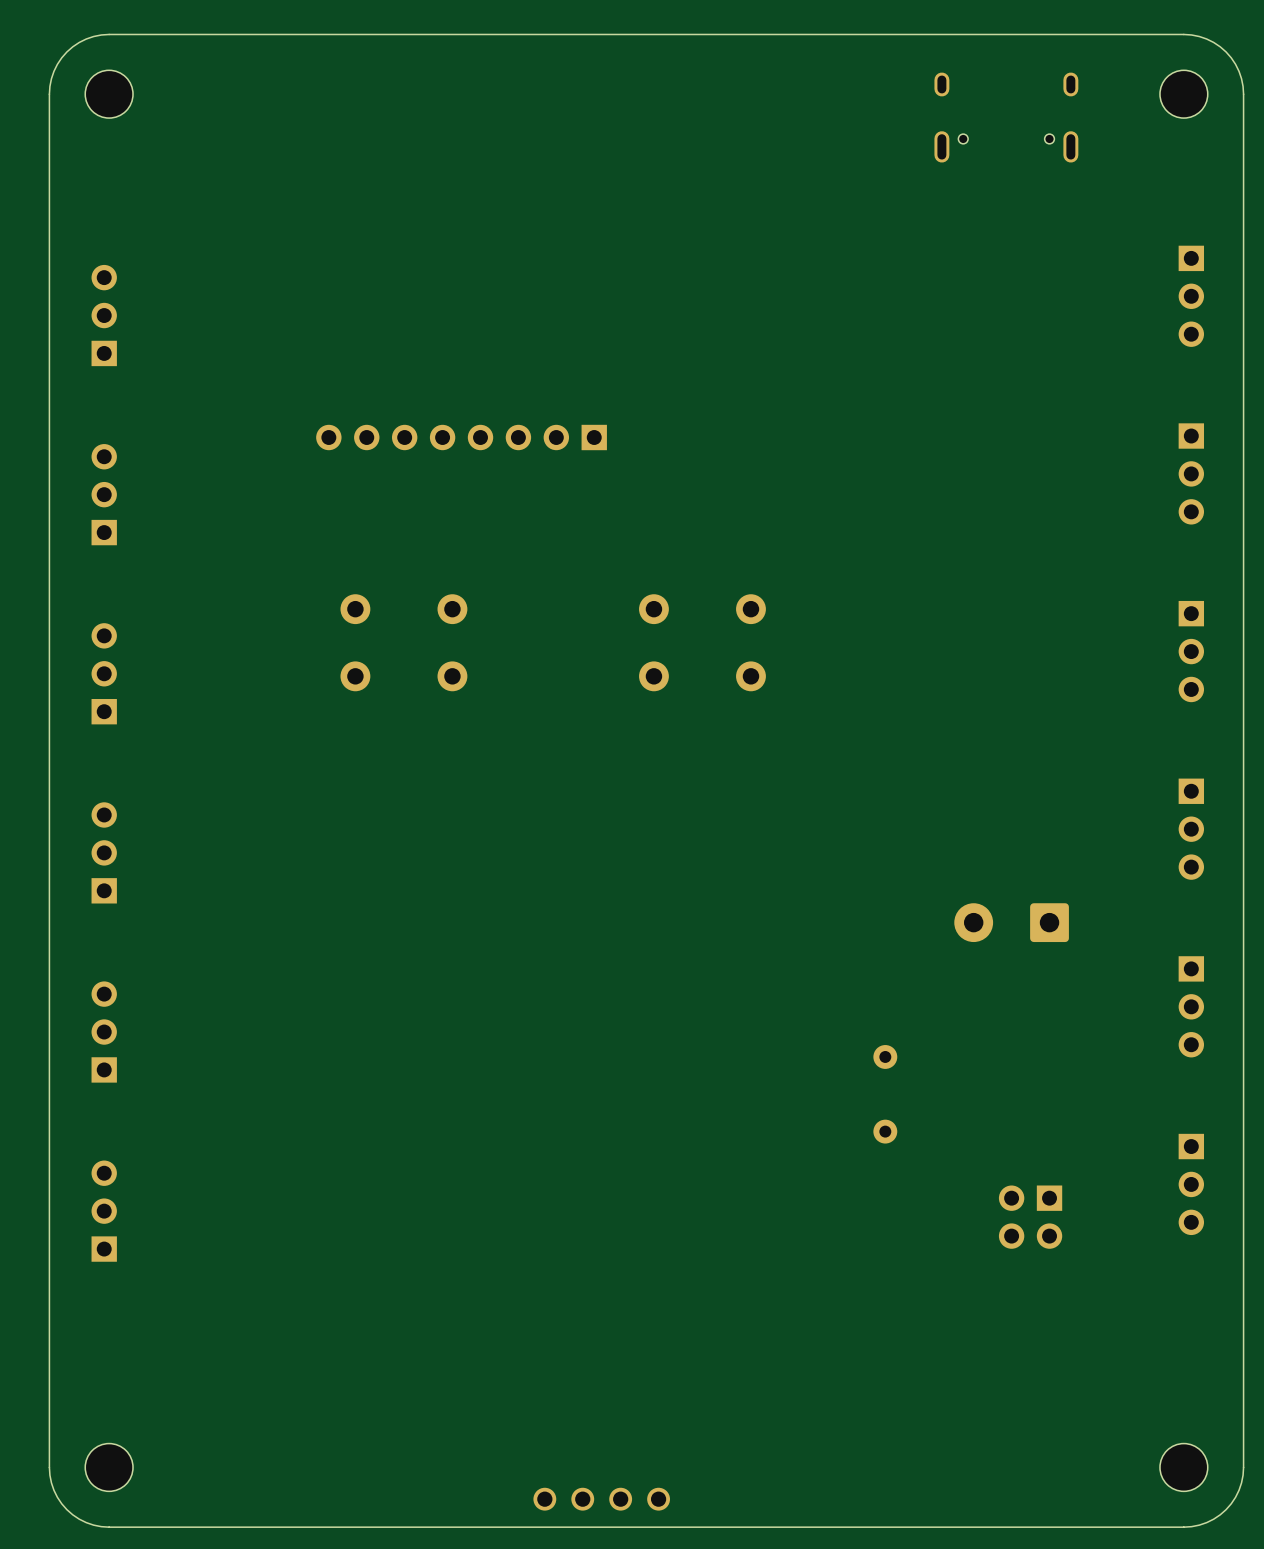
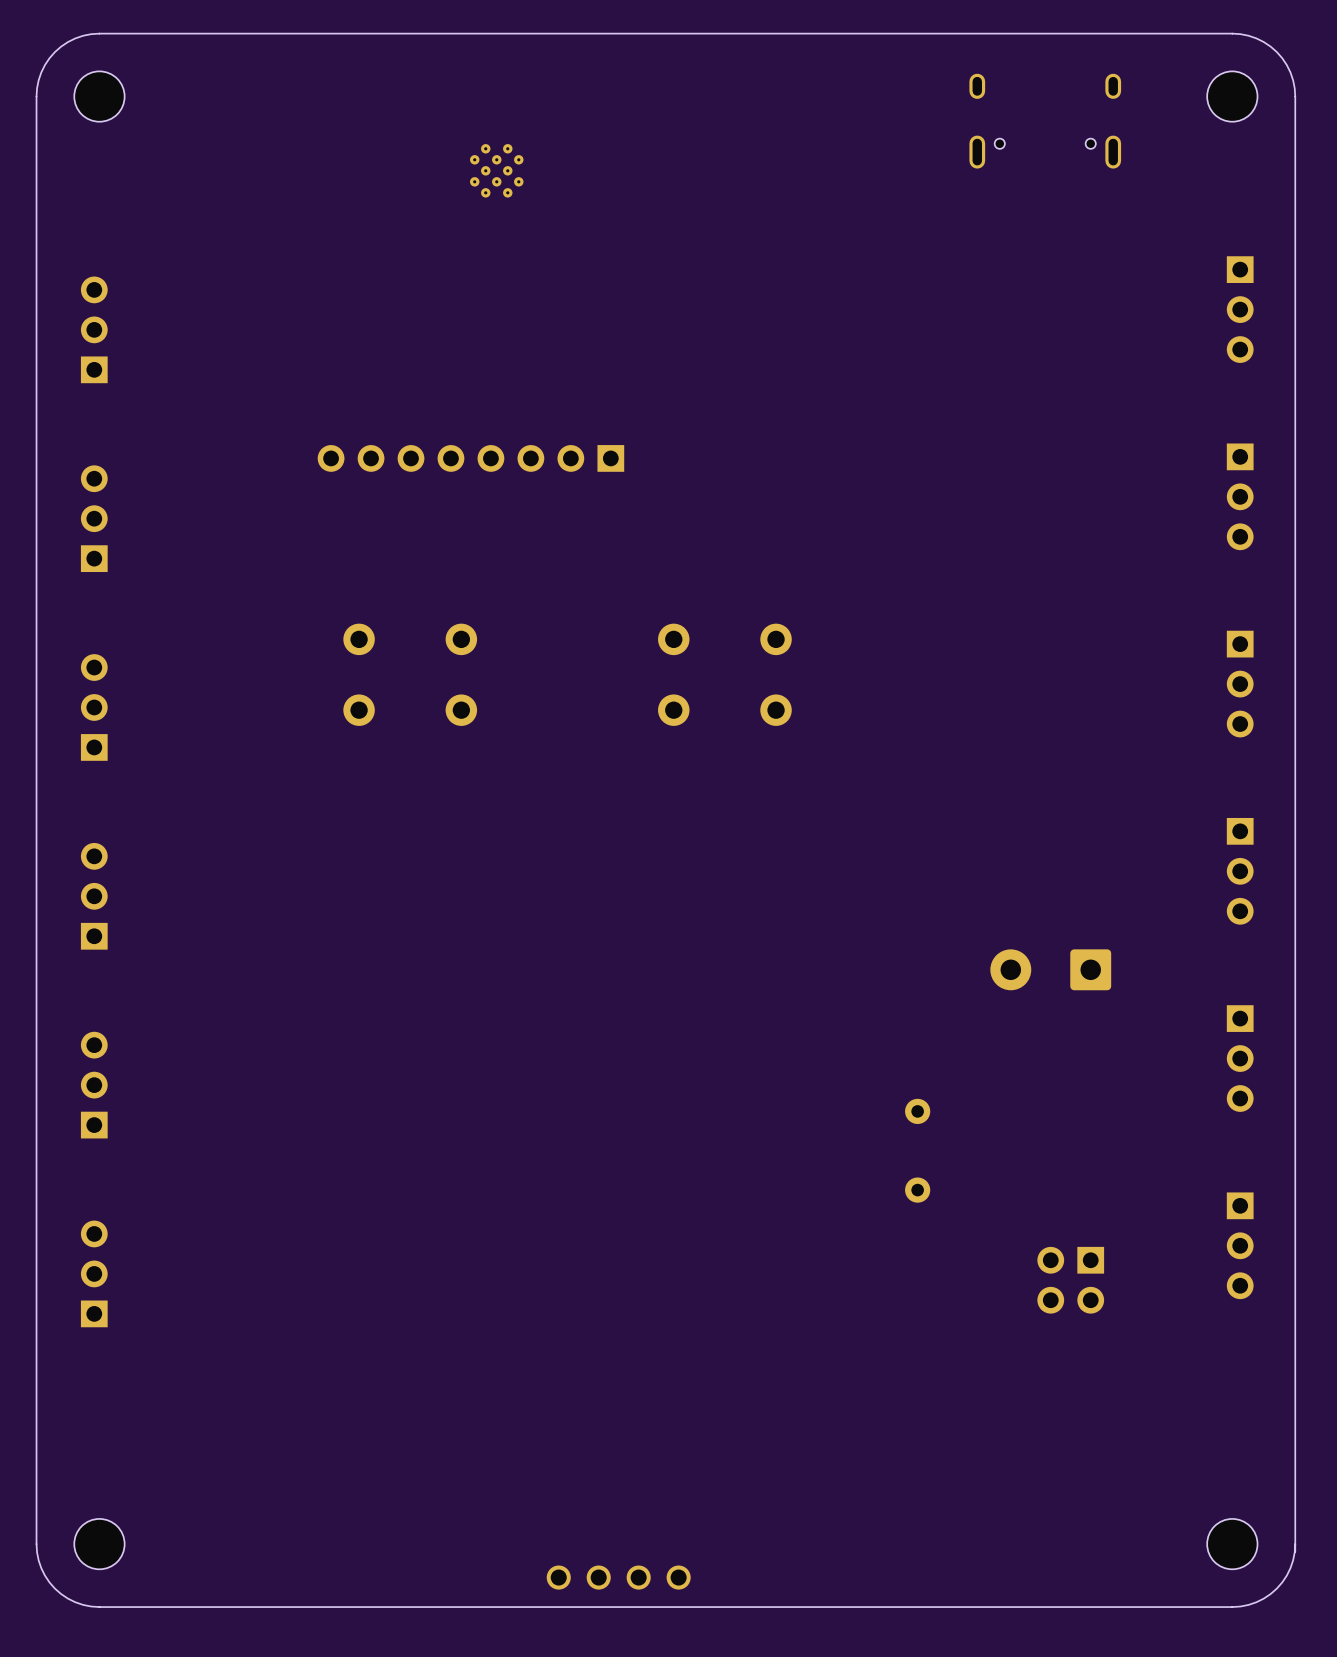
part: none -> (496, 170)

